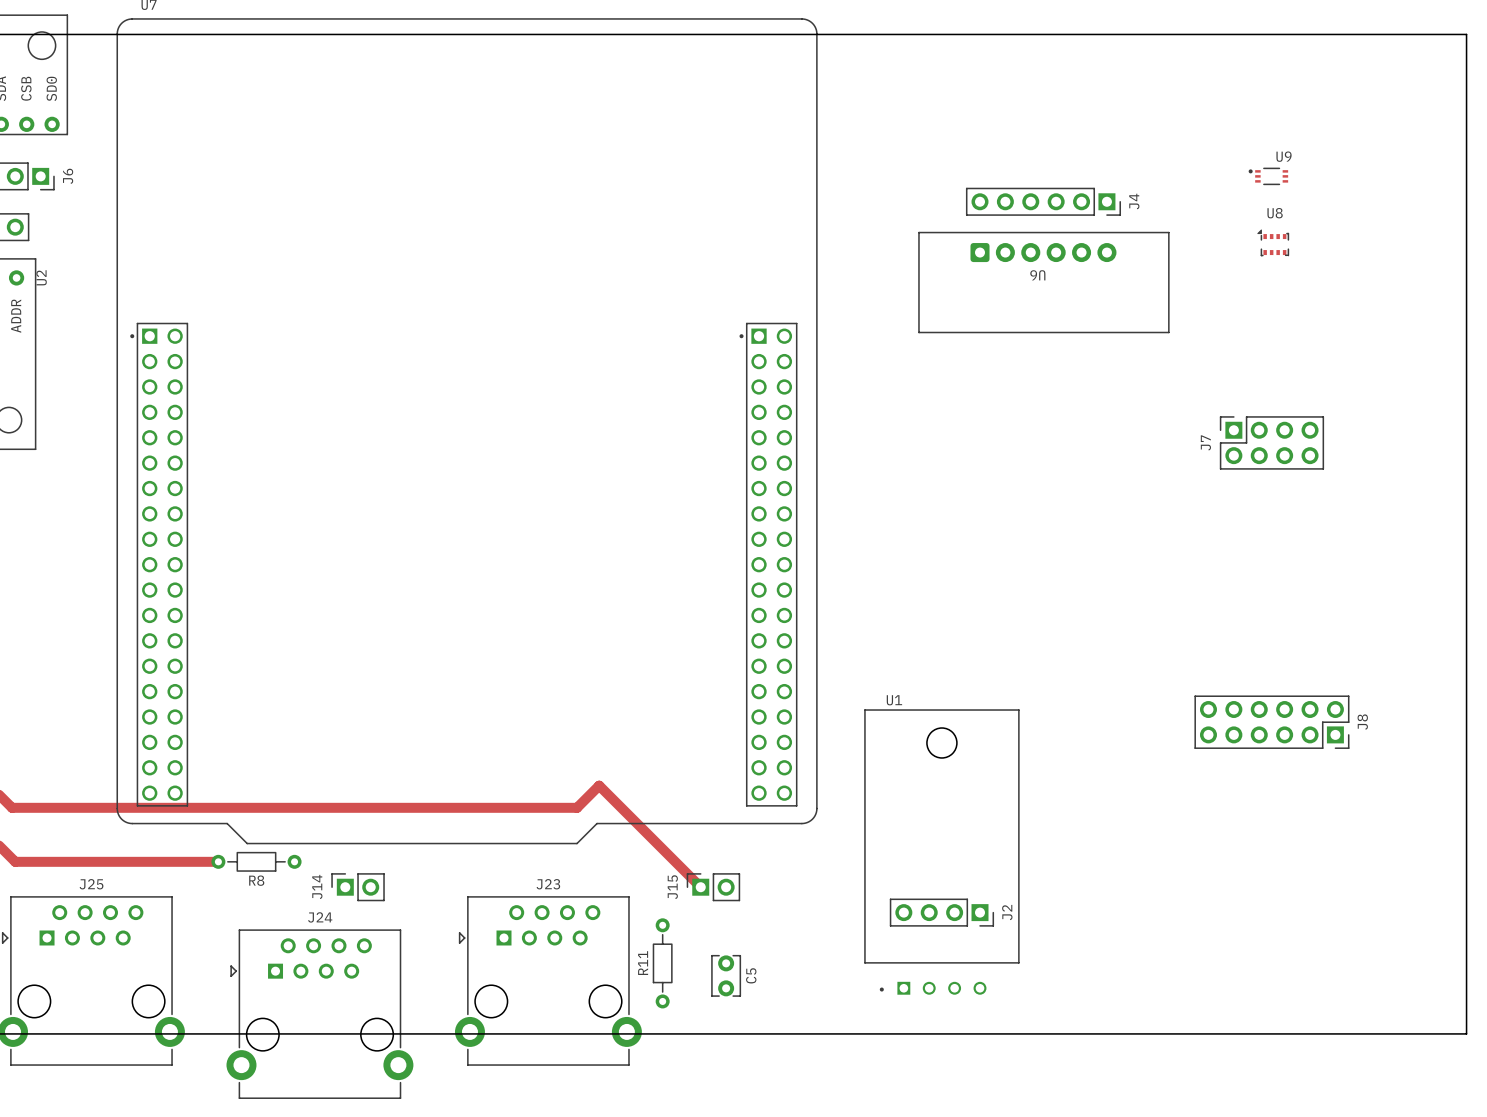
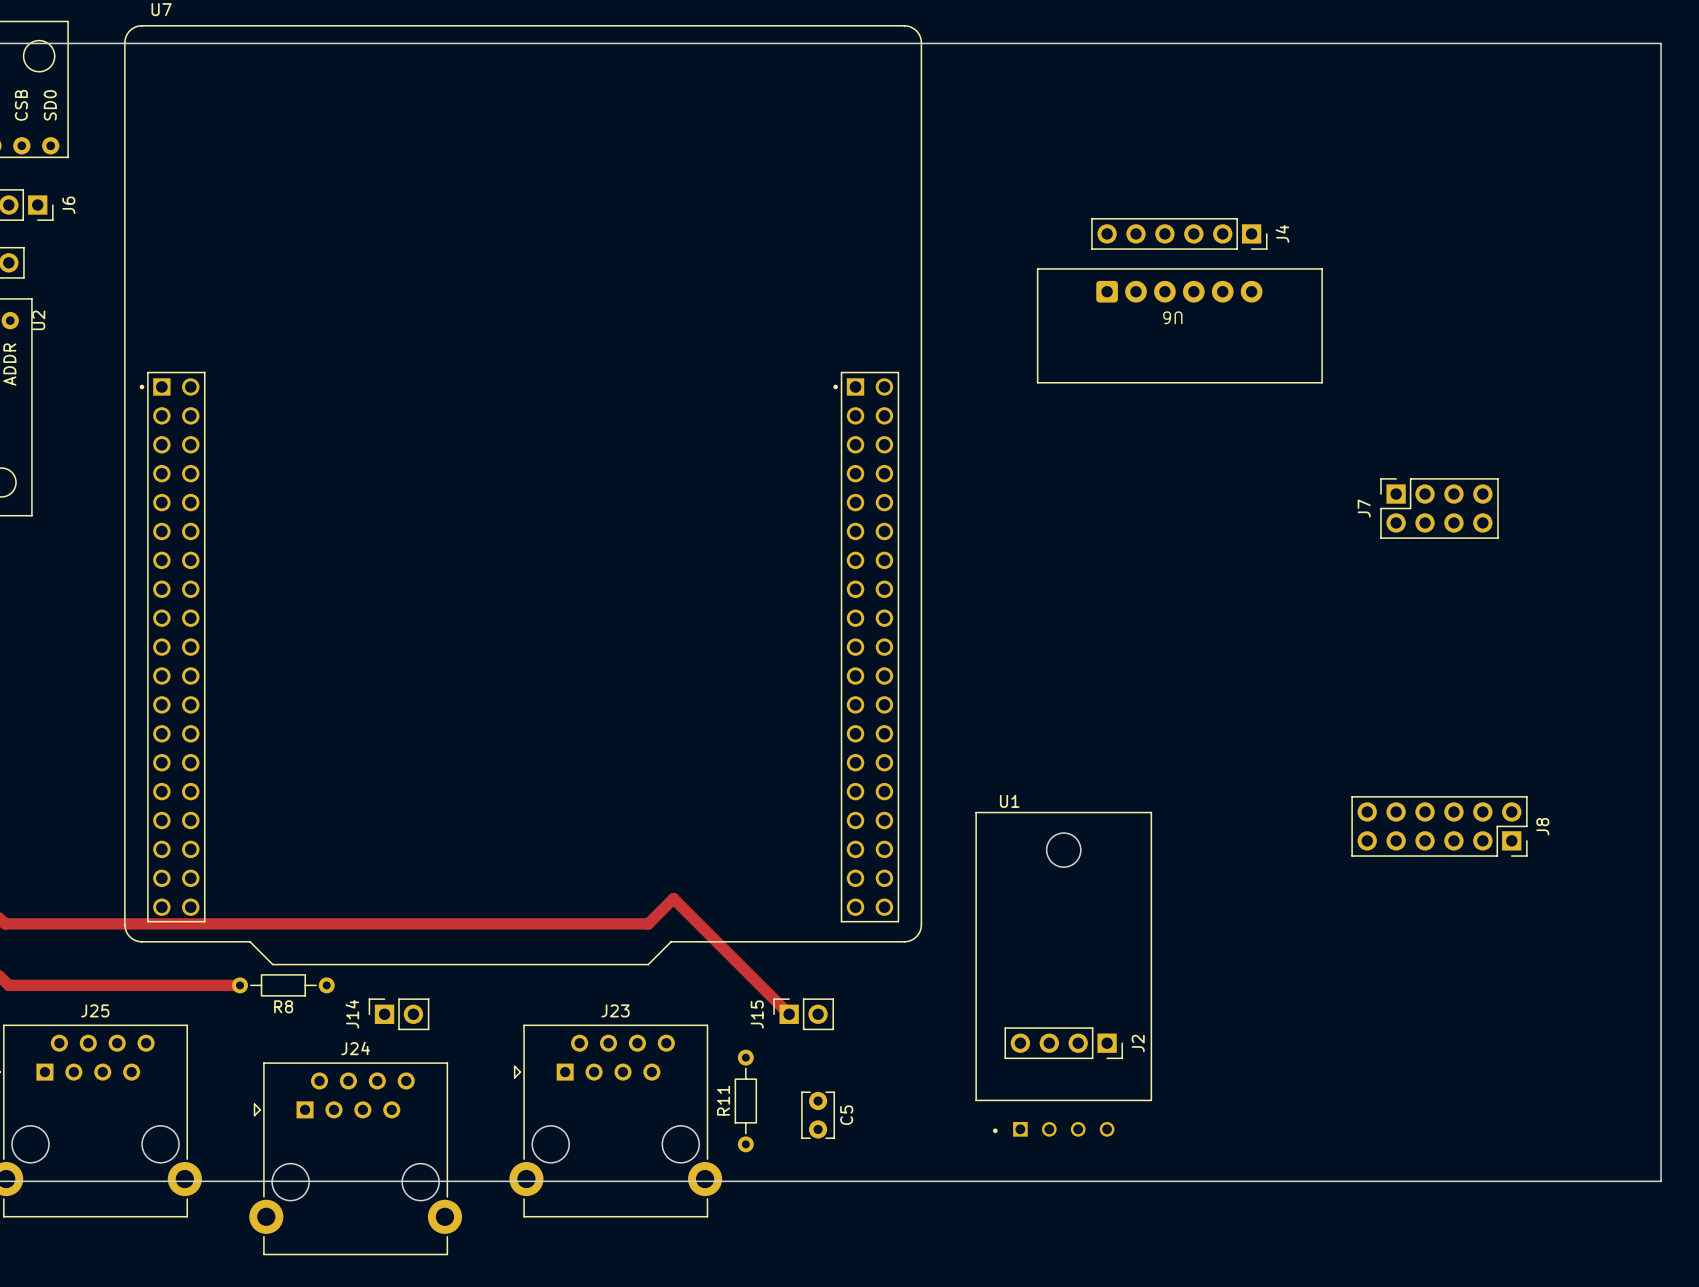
U9: (1268, 176) -> none
U8: (1273, 242) -> none

